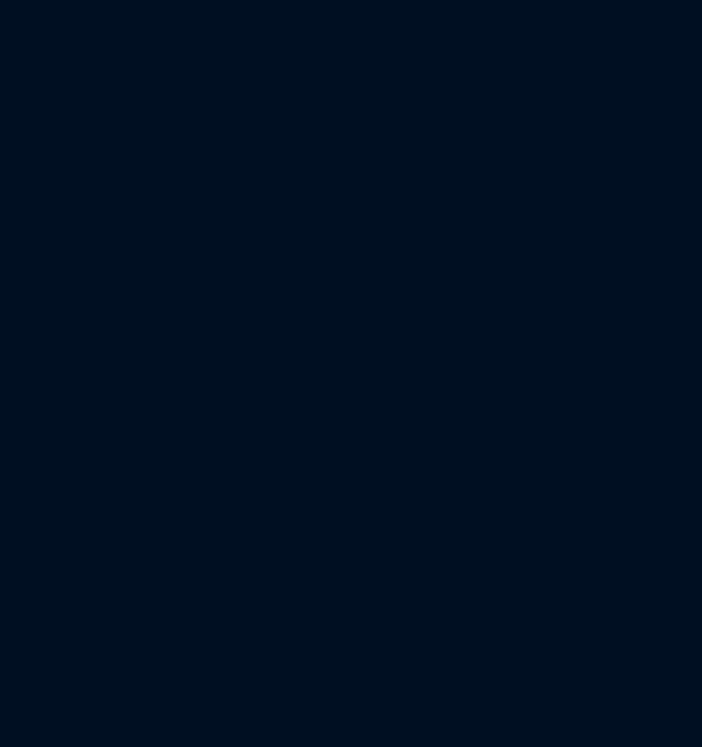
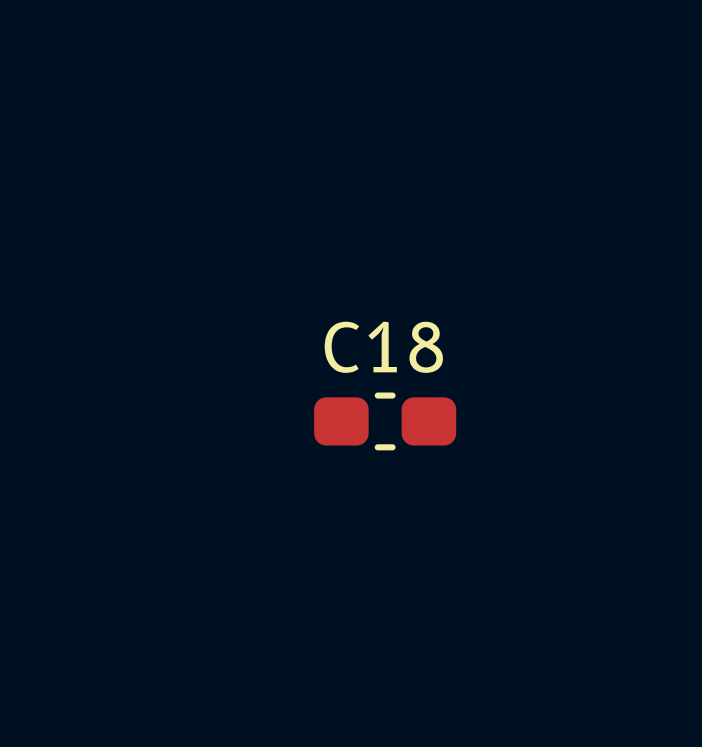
C18: none -> (385, 421)

